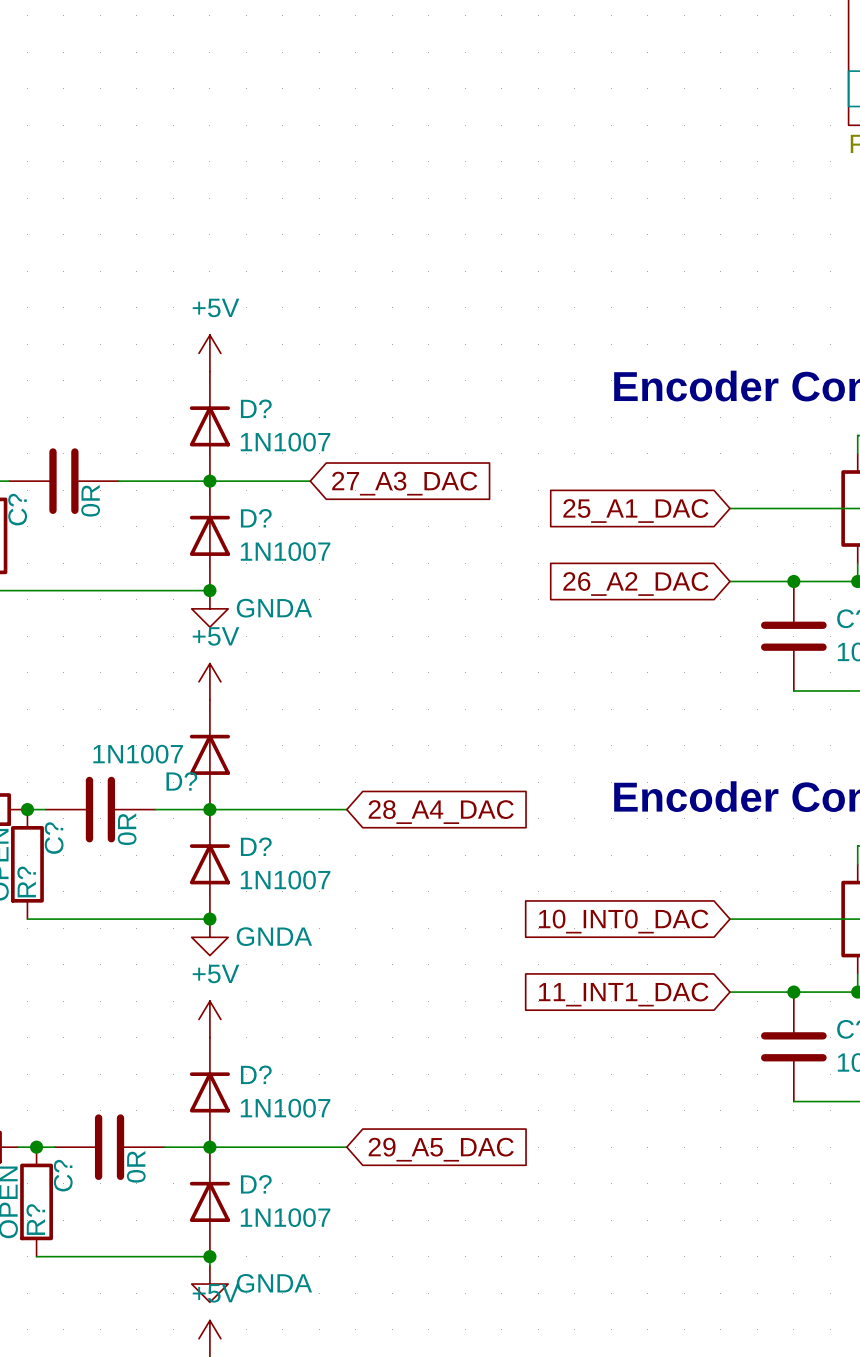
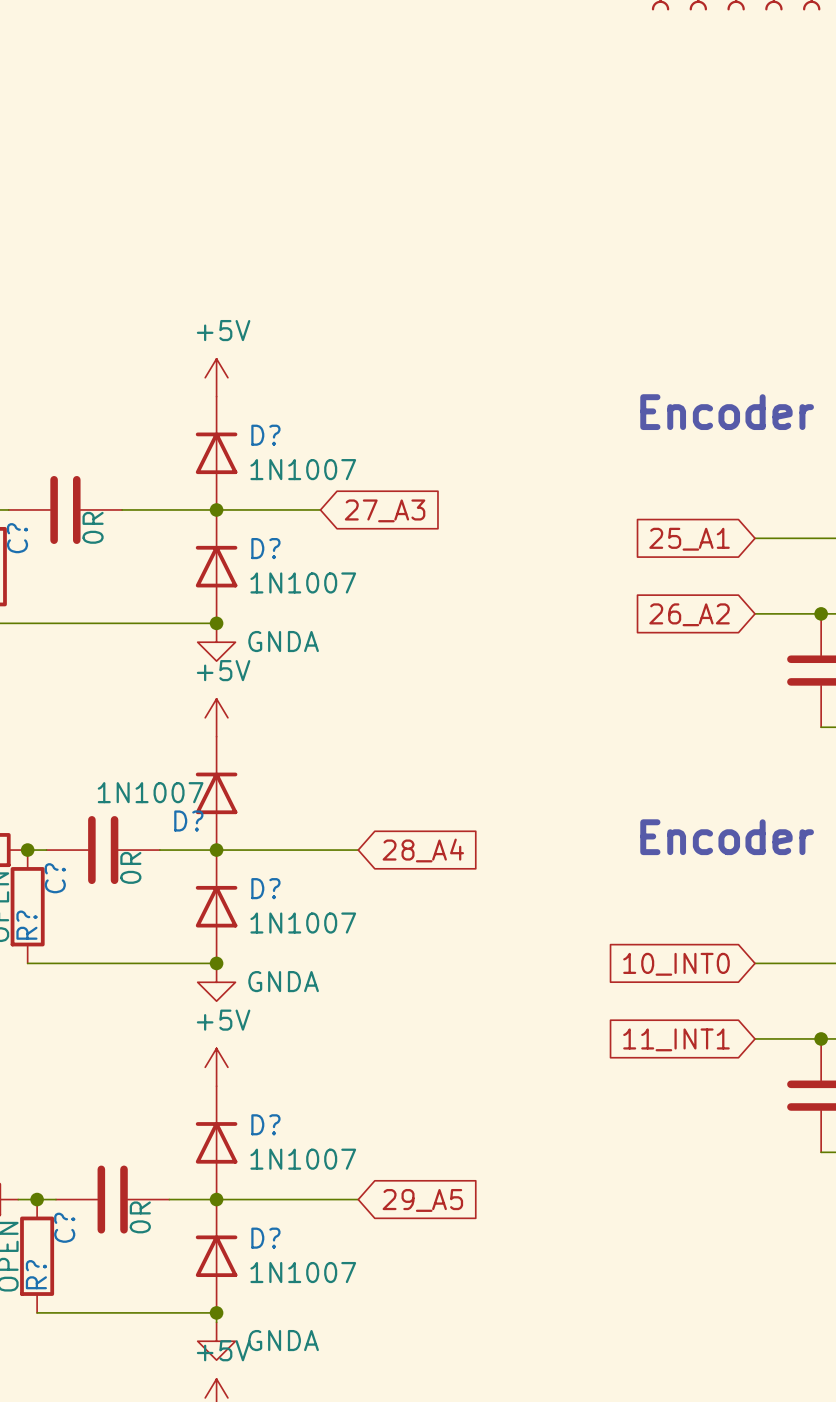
global label: 27_A3_DAC (404, 483) -> 27_A3 (385, 510)
global label: 25_A1_DAC (635, 511) -> 25_A1 (689, 539)
global label: 26_A2_DAC (635, 583) -> 26_A2 (689, 614)
global label: 28_A4_DAC (441, 812) -> 28_A4 (423, 850)
global label: 10_INT0_DAC (623, 921) -> 10_INT0 (676, 964)
global label: 11_INT1_DAC (623, 994) -> 11_INT1 (676, 1039)
global label: 29_A5_DAC (441, 1149) -> 29_A5 (422, 1200)

